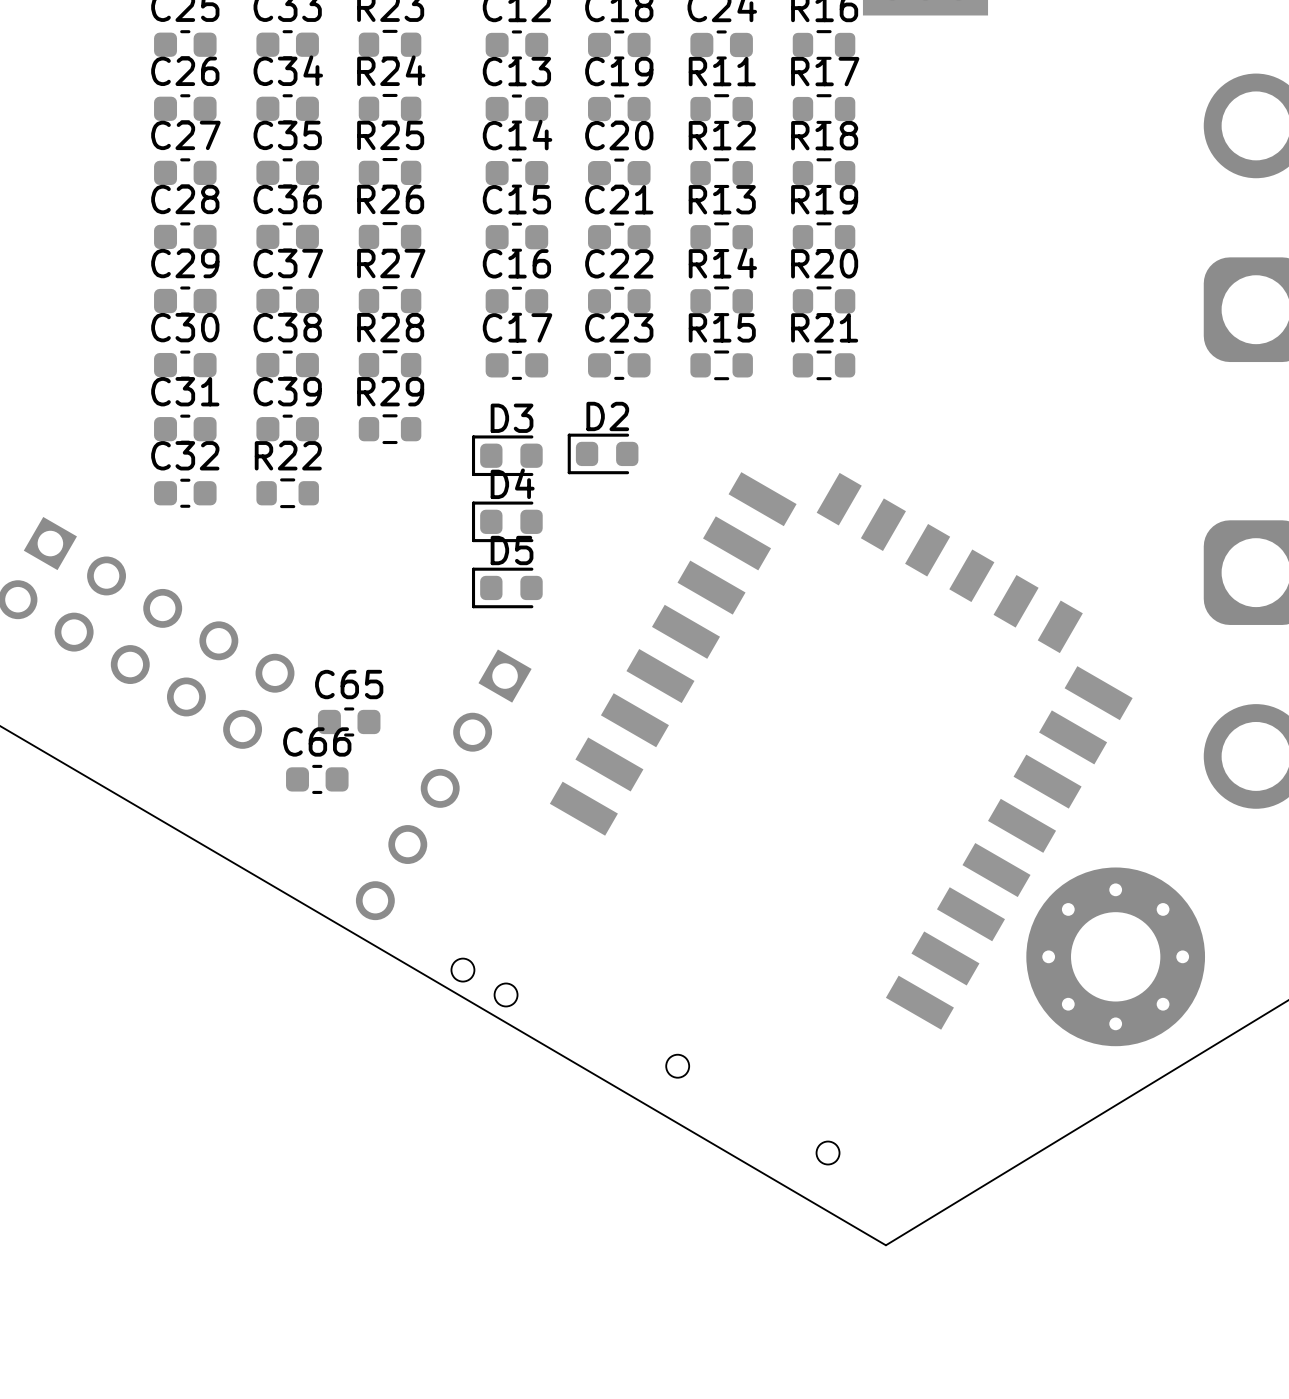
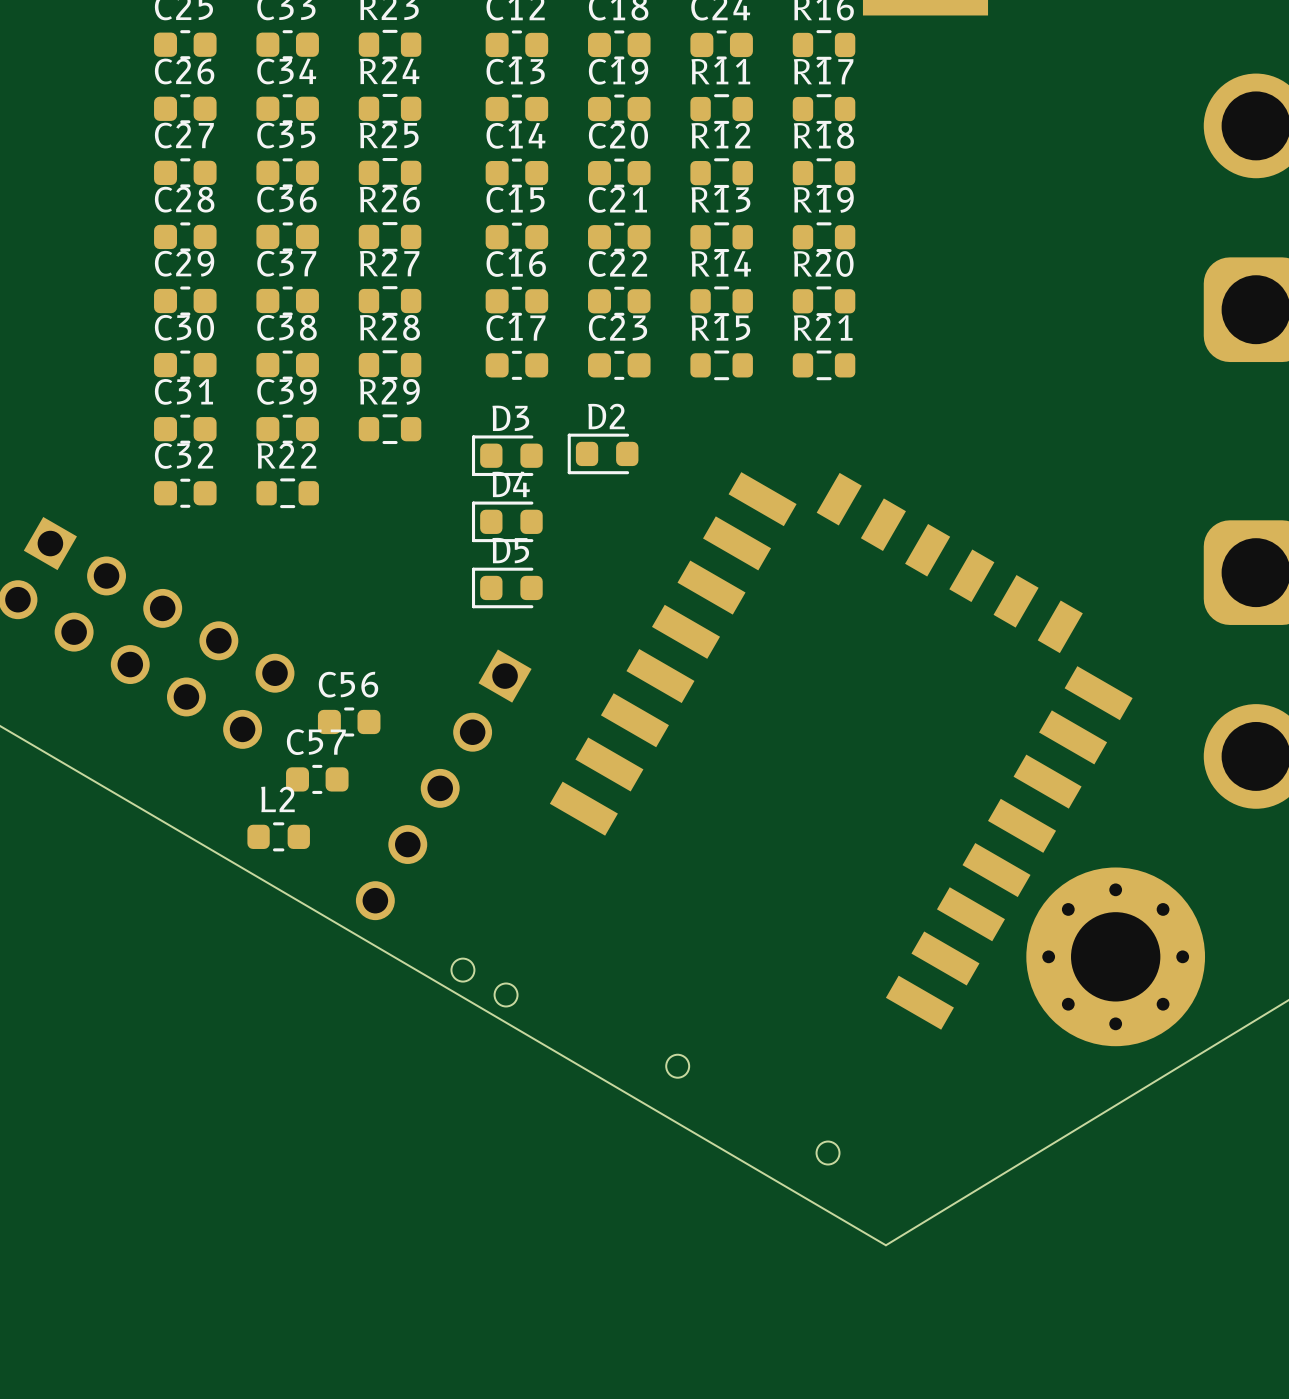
C65 name: C65 (349, 684) -> C56 (348, 684)
C66 name: C66 (317, 741) -> C57 (316, 742)
L2: none -> (278, 836)

